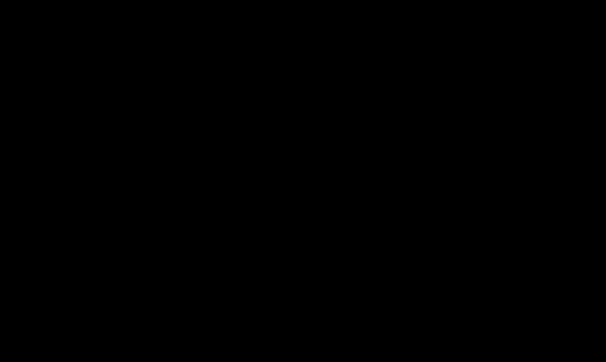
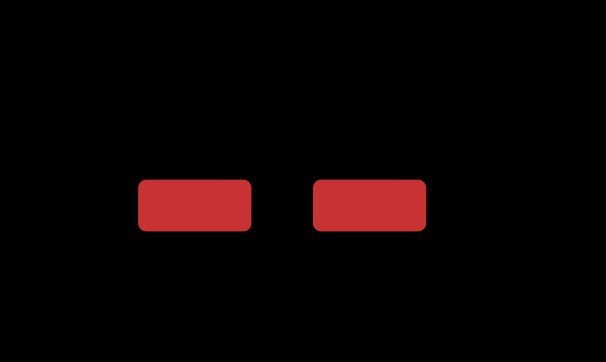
part: none -> (282, 205)

